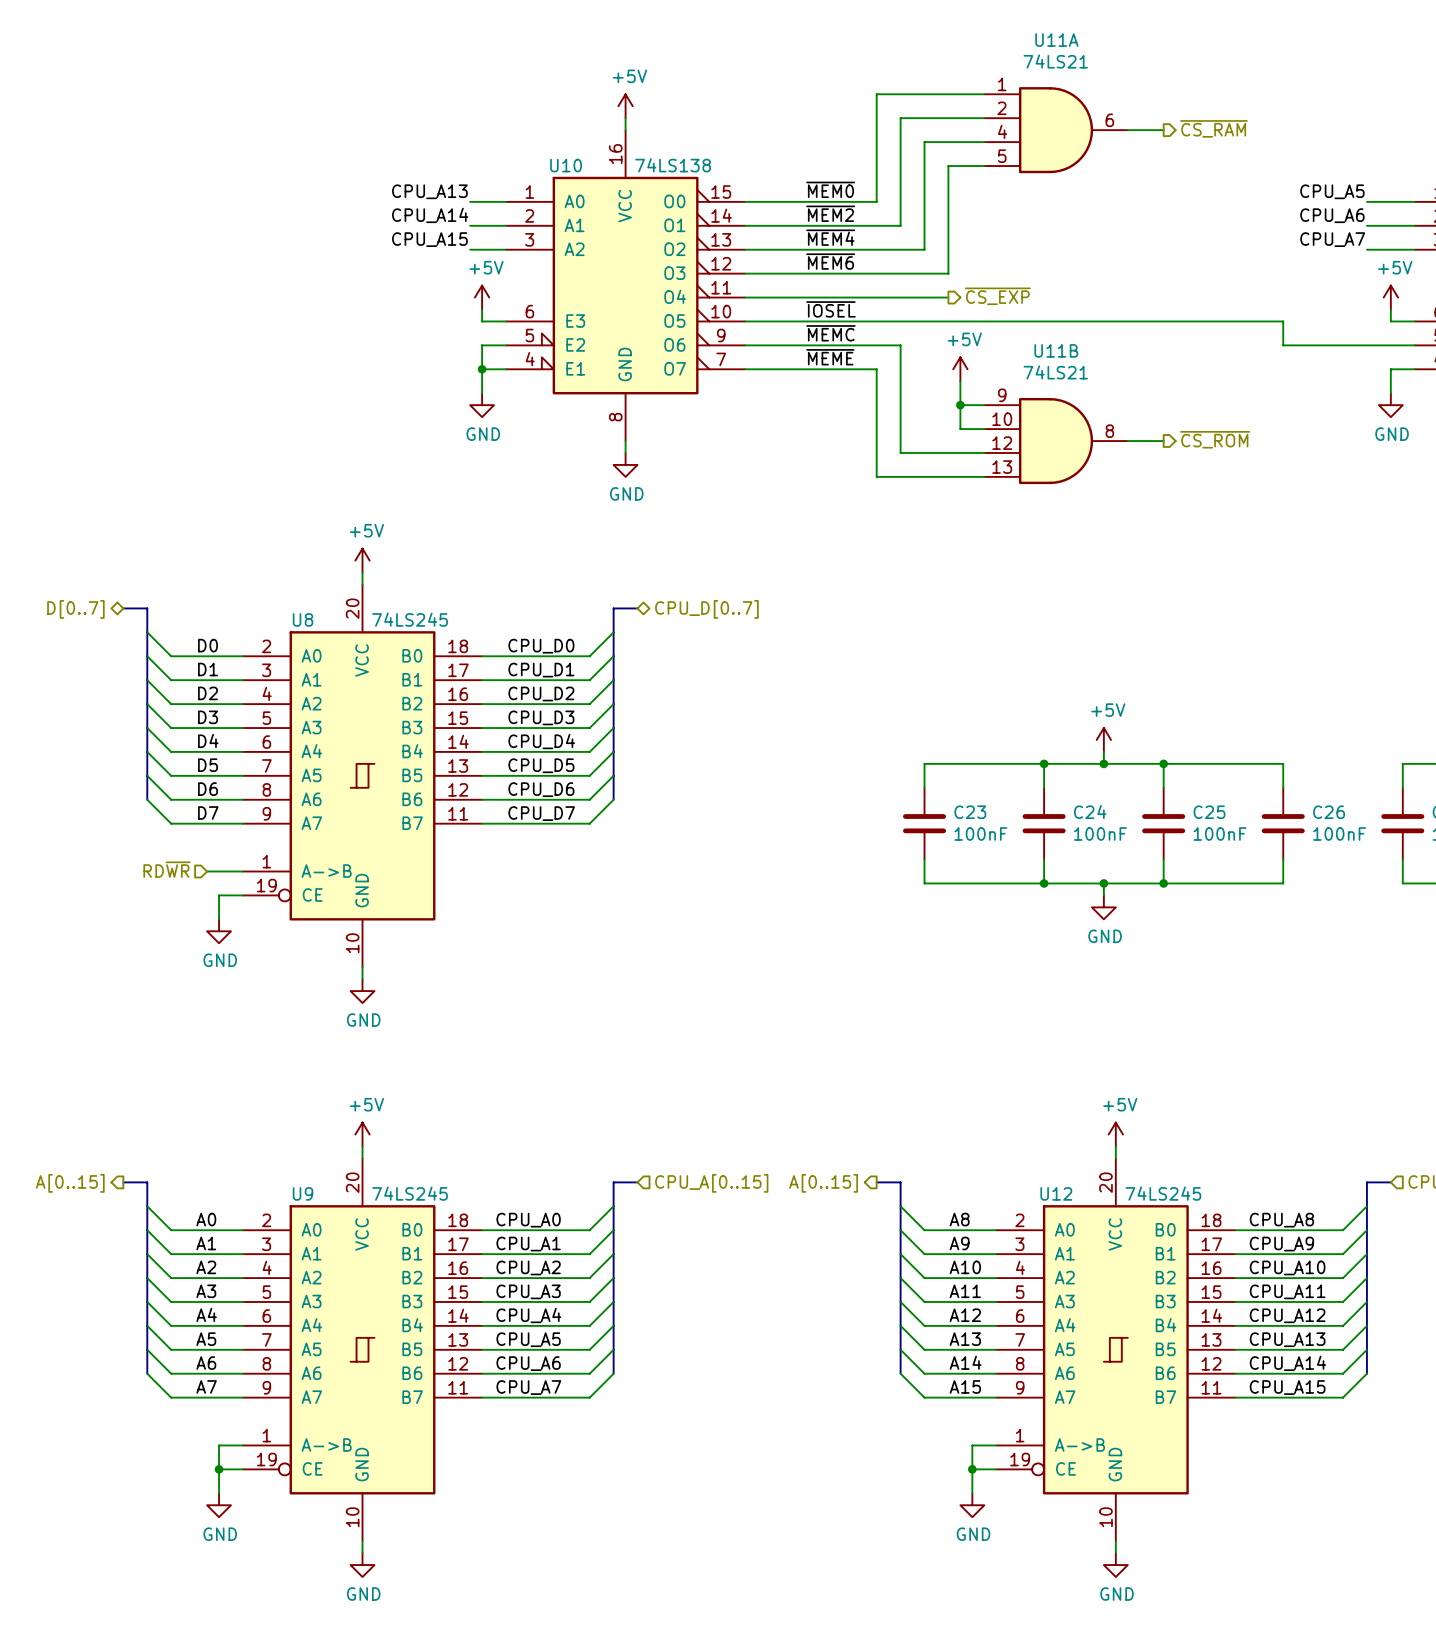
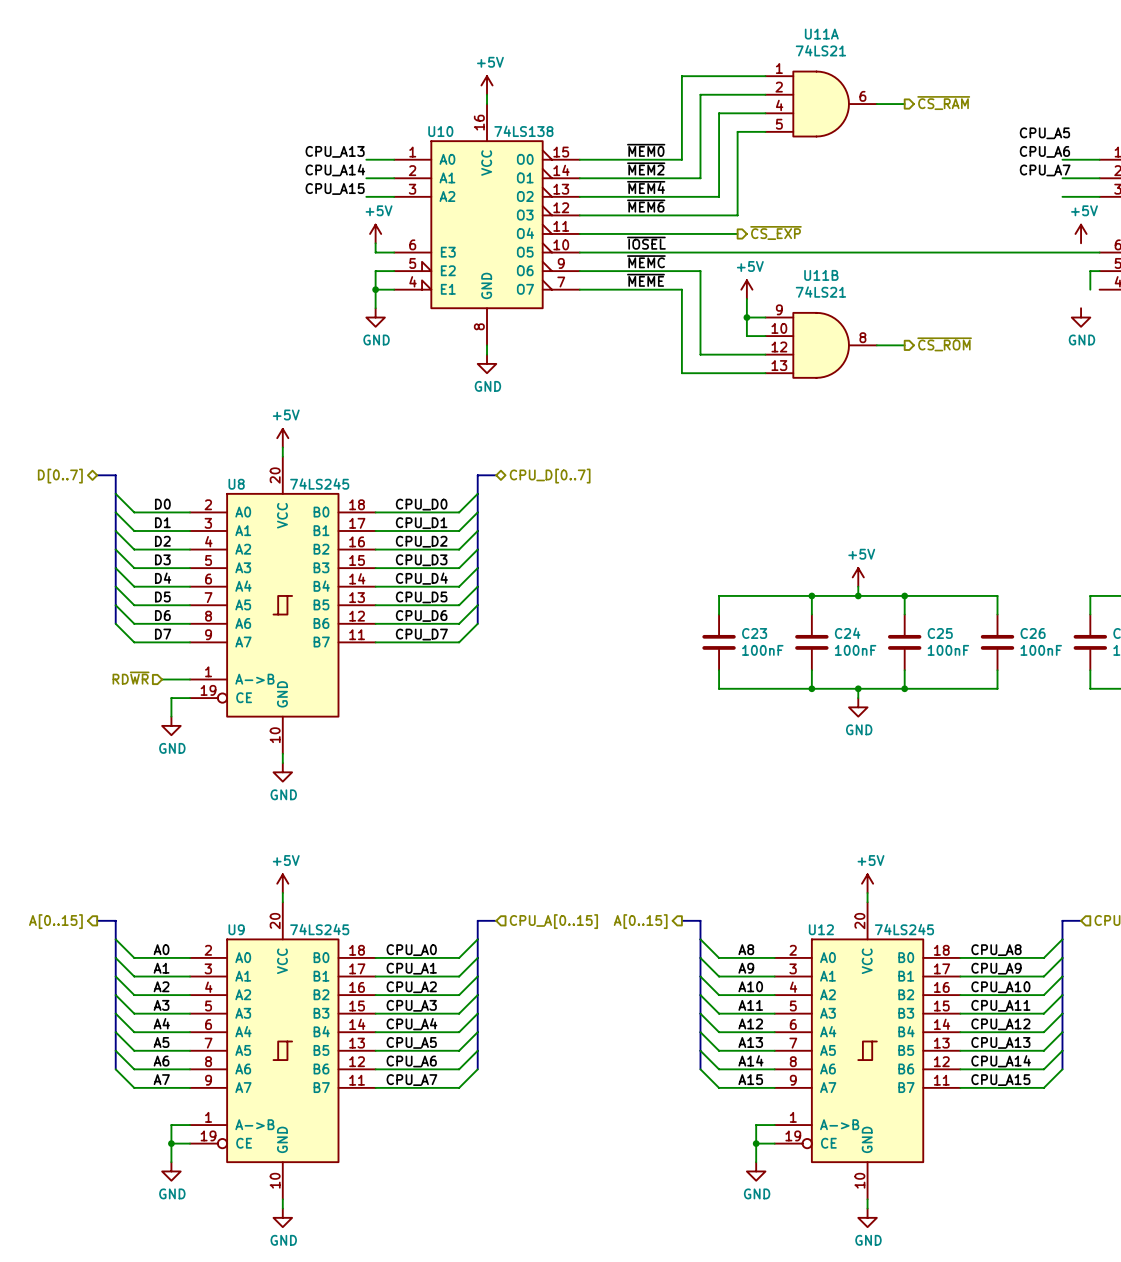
label position: CPU_A5 (1332, 191) -> CPU_A5 (1044, 133)
label position: CPU_A6 (1332, 215) -> CPU_A6 (1044, 151)
label position: CPU_A7 (1332, 239) -> CPU_A7 (1045, 170)
wire: (1390, 309) (1390, 321) -> none
wire: (1283, 321) (1283, 345) (1402, 345) -> (997, 252) (1081, 252)
wire: none -> (1090, 271) (1090, 289)
wire: (1414, 369) (1390, 369) (1390, 393) -> none

